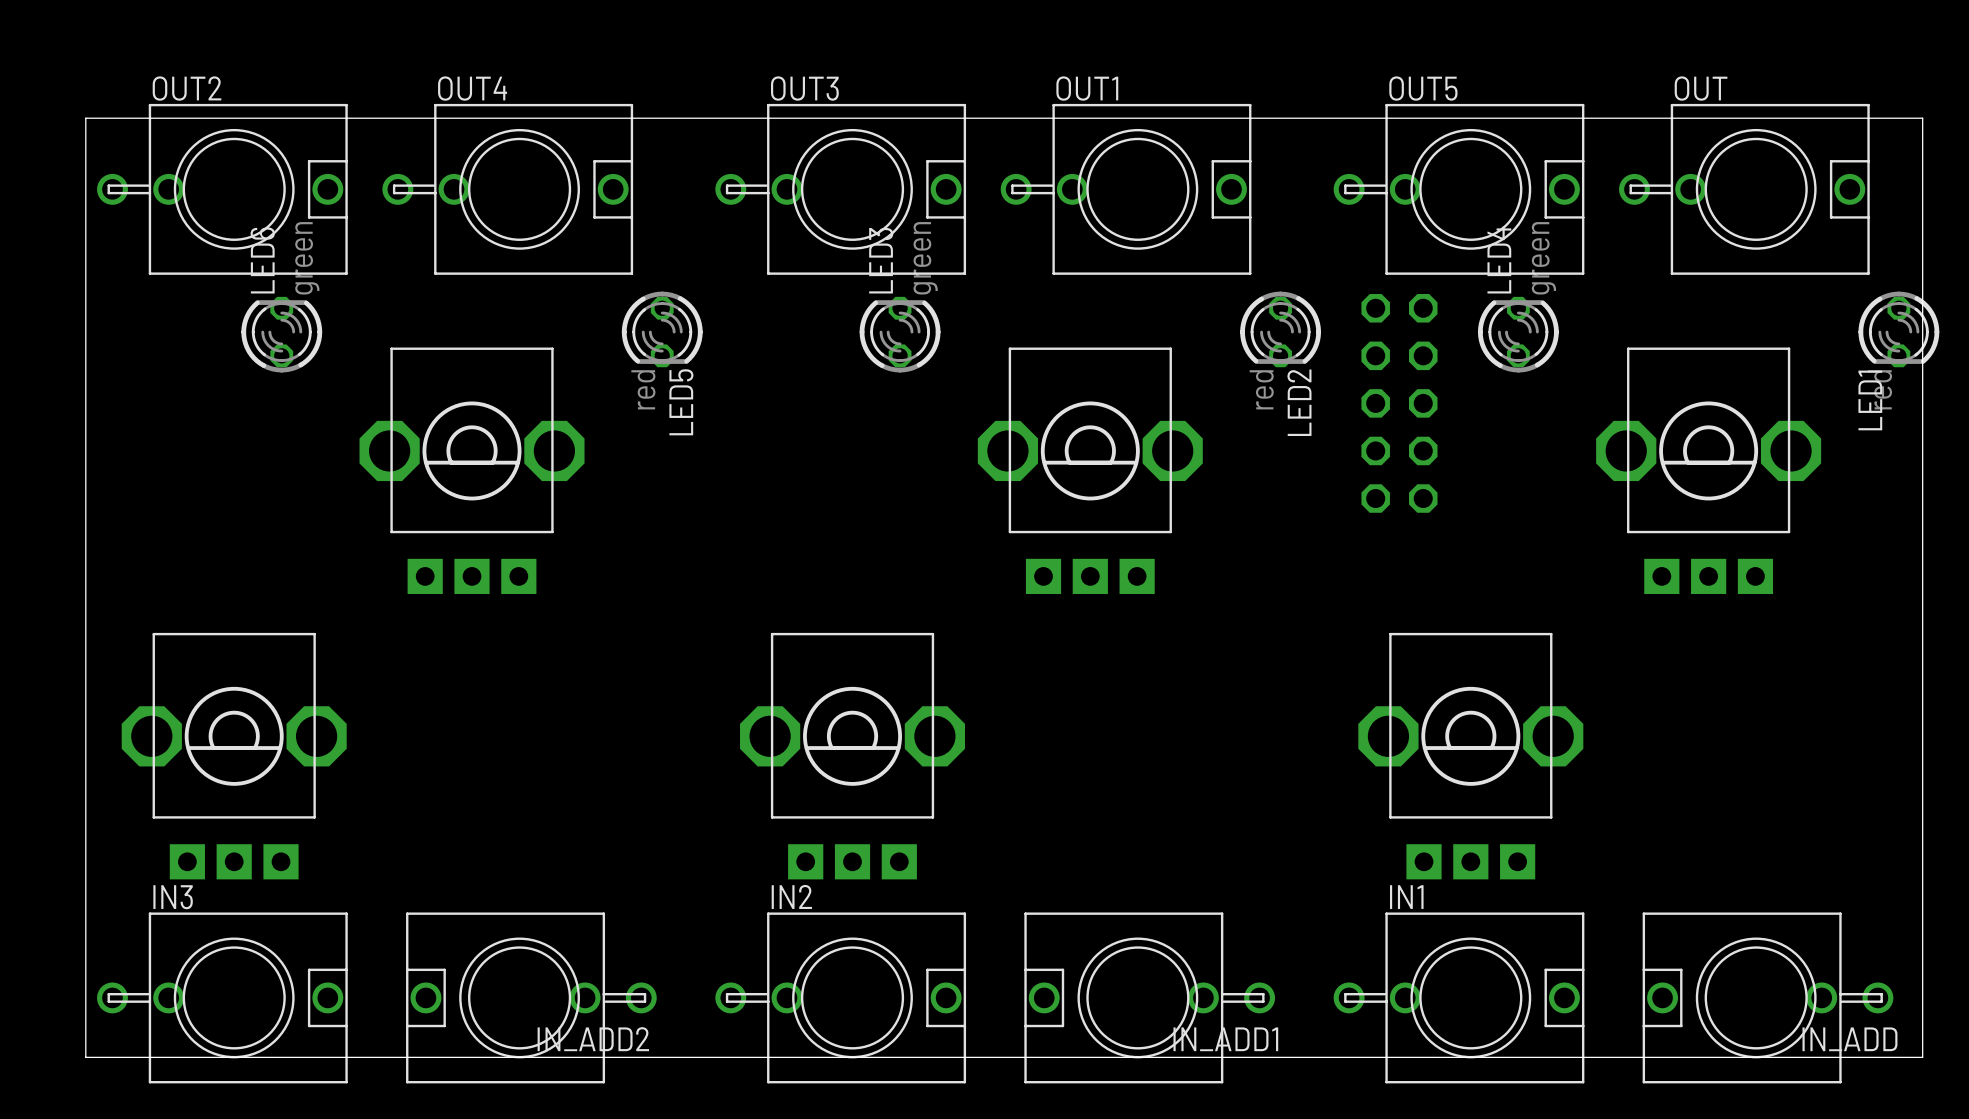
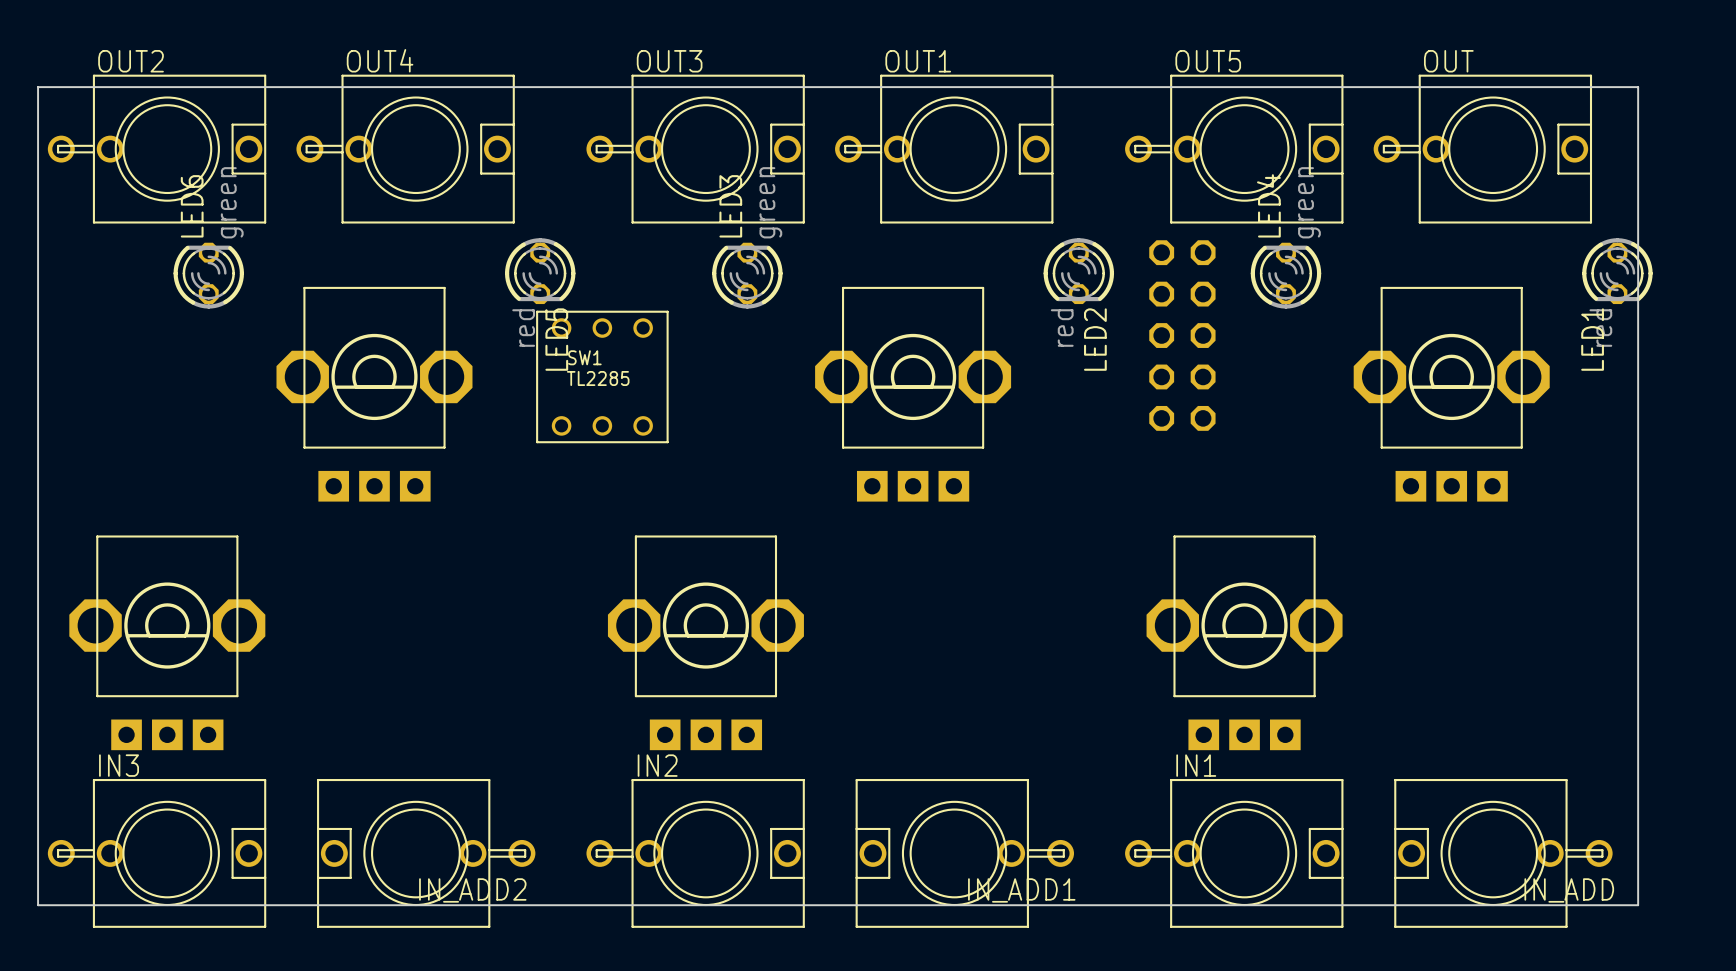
SW1: none -> TL2285 (602, 376)

